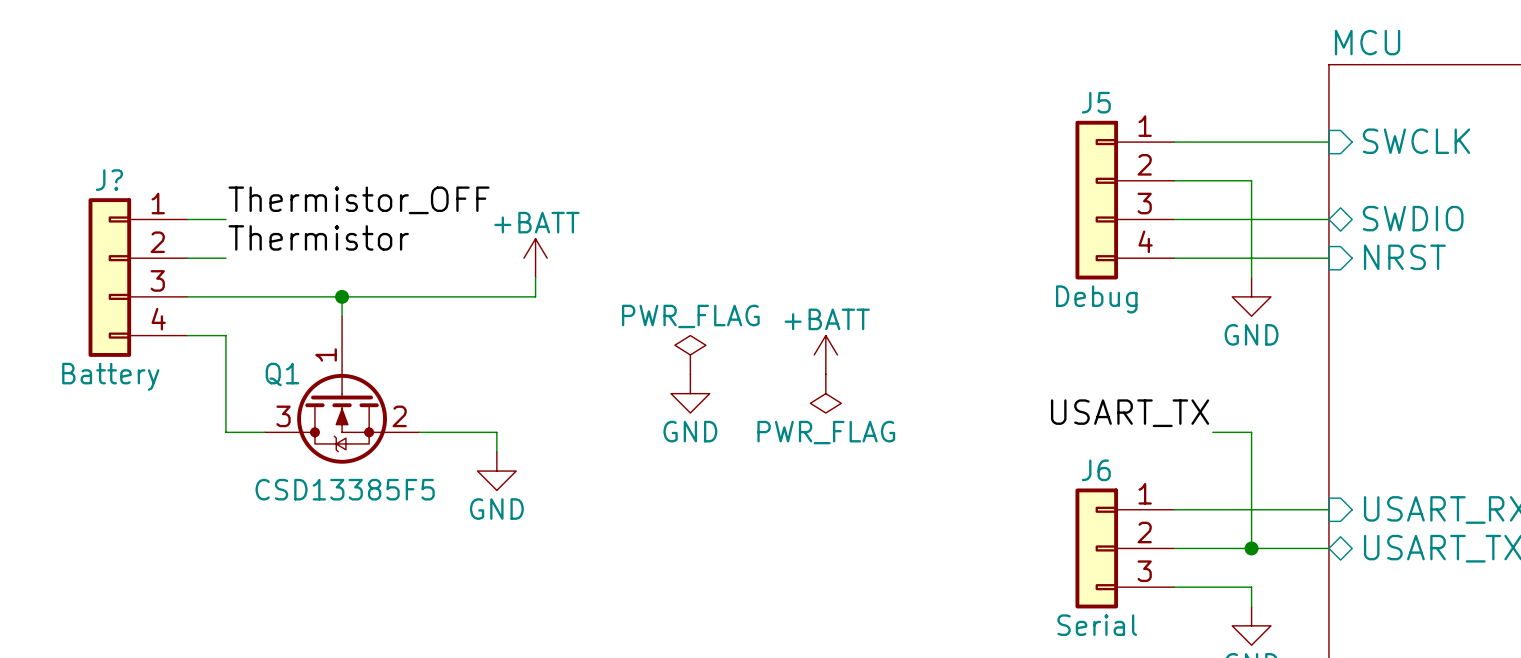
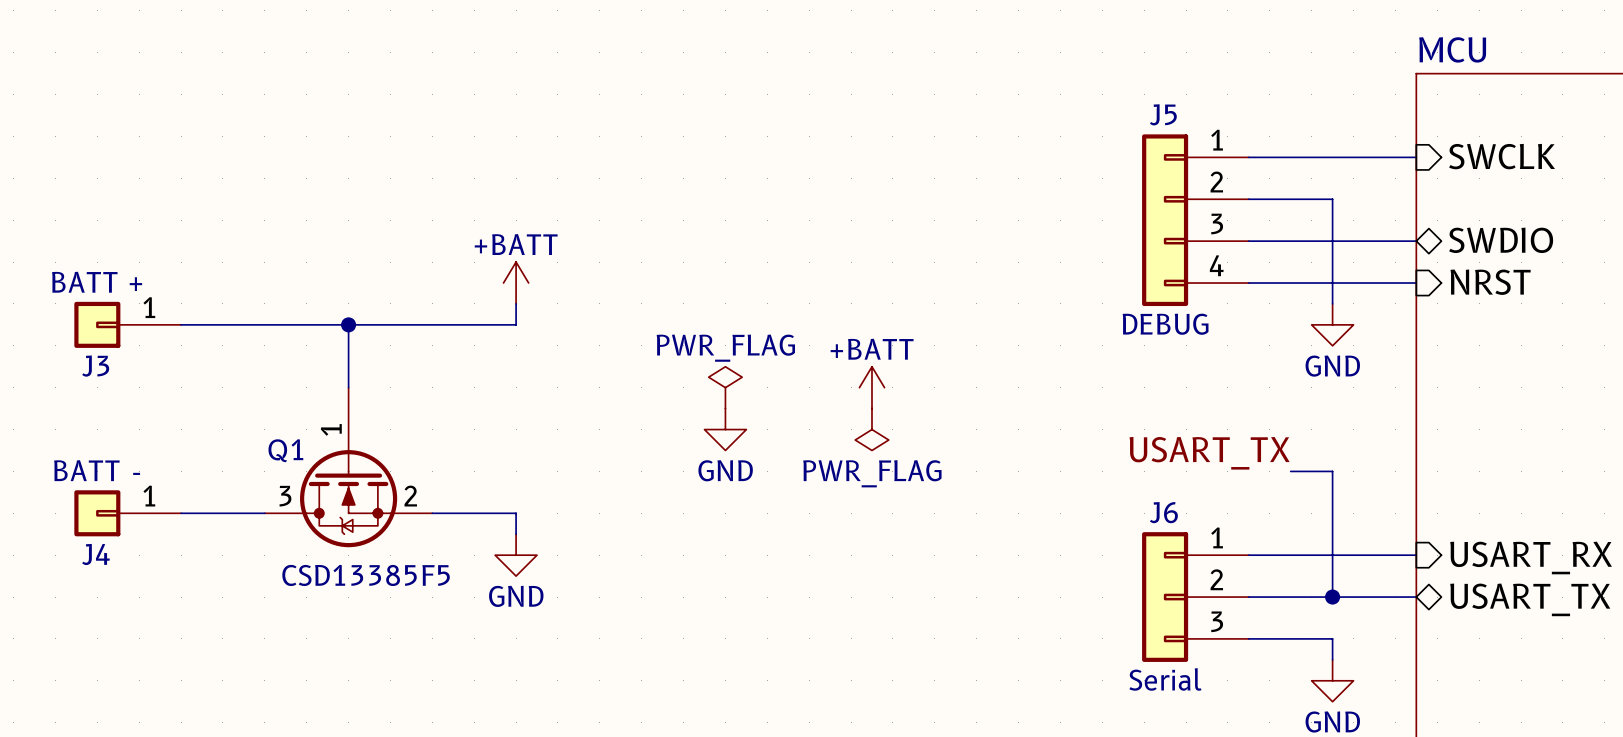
label: Thermistor_OFF (359, 200) -> none
wire: (187, 219) (225, 219) -> none
label: Thermistor (318, 237) -> none
wire: (187, 258) (225, 258) -> none
power symbol position: +BATT (535, 258) -> +BATT (516, 283)
J?: Battery (137, 277) -> none
wire: (535, 277) (535, 296) (496, 296) -> (516, 303) (516, 324)
J3: none -> BATT + (127, 324)
J5 value: Debug (1096, 299) -> DEBUG (1165, 324)
wire: (187, 335) (225, 335) (225, 432) (264, 432) -> none
Q1 position: (342, 389) -> (348, 467)
wire: (419, 432) (496, 432) (496, 451) -> (432, 513) (516, 513) (516, 534)
J4: none -> BATT - (127, 513)
wire: none -> (181, 513) (264, 513)
power symbol position: GND (496, 471) -> GND (516, 555)

